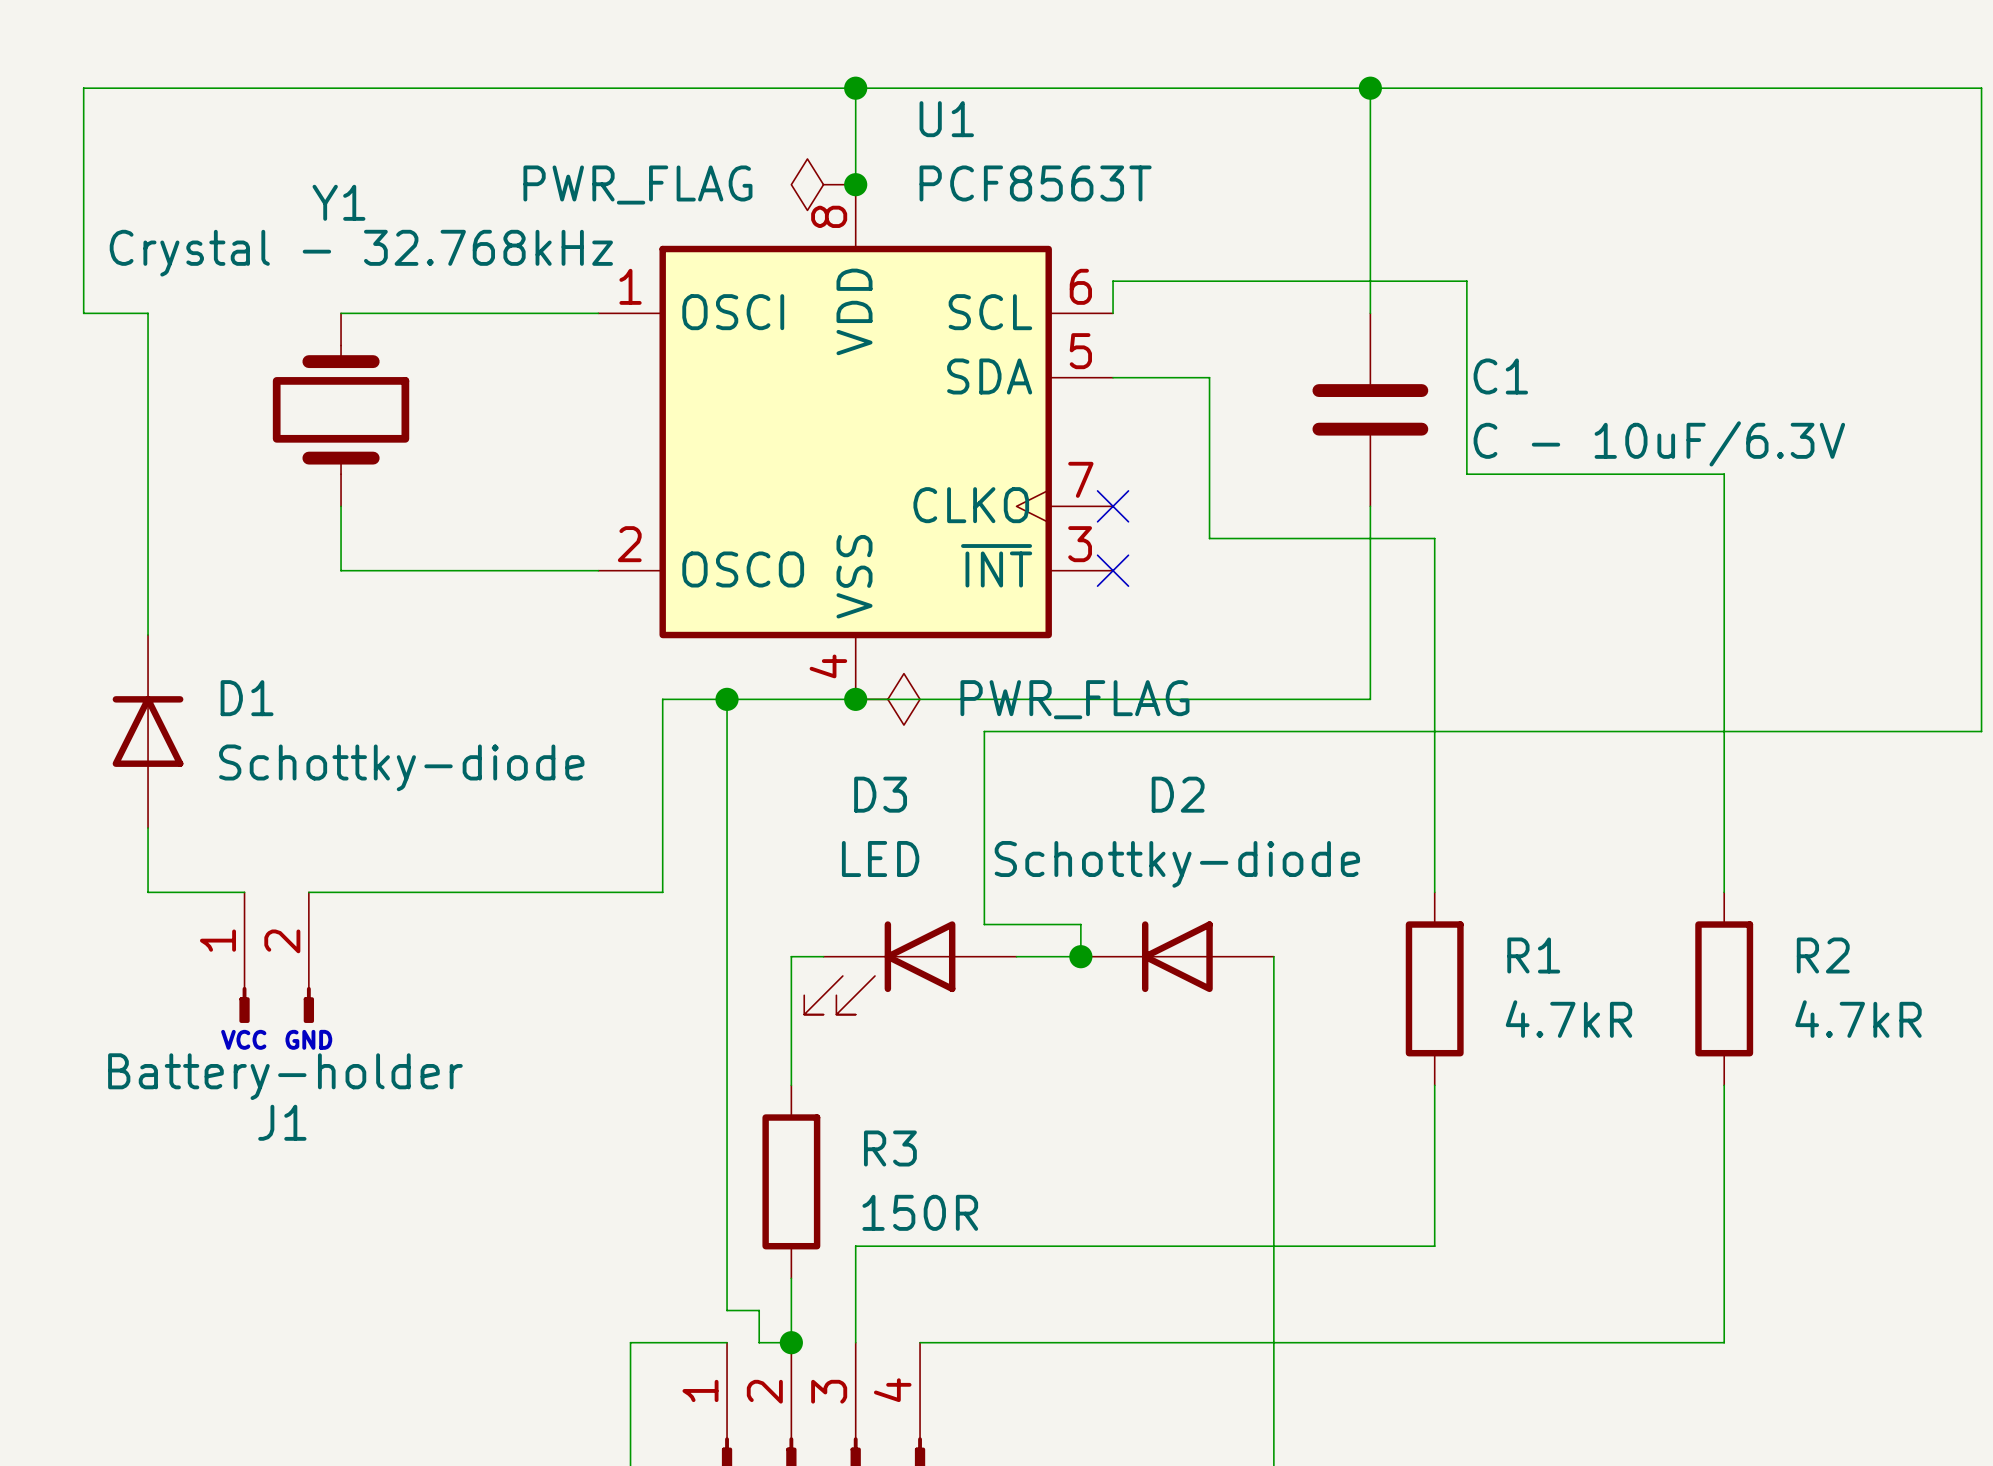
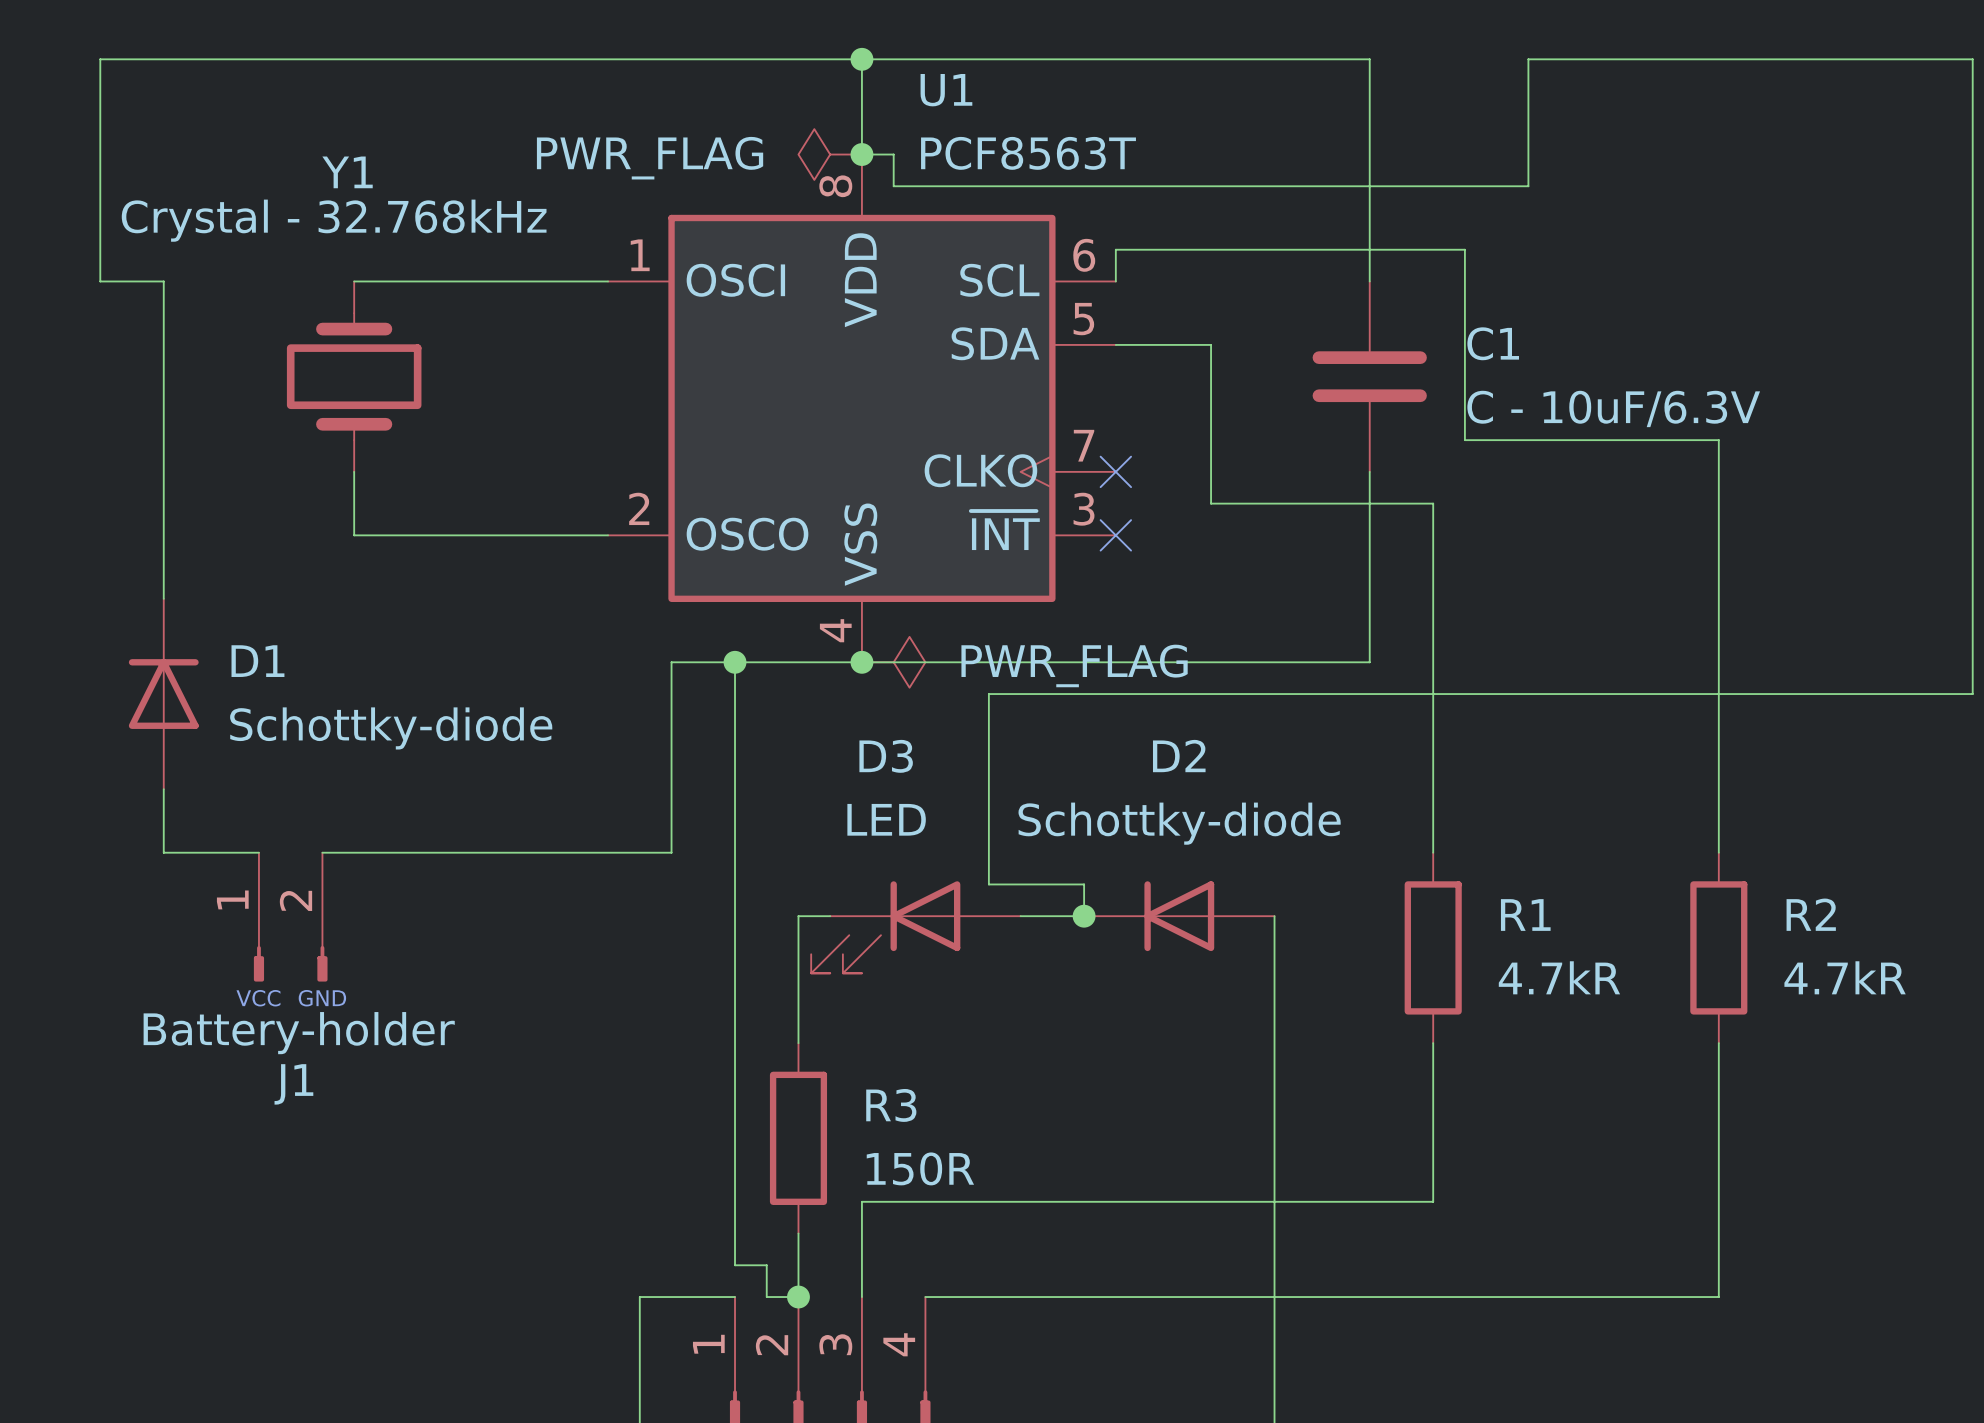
wire: (1370, 88) (1531, 88) -> (861, 154) (893, 154) (893, 186) (1528, 186) (1528, 59)
junction: (1370, 88) -> none

